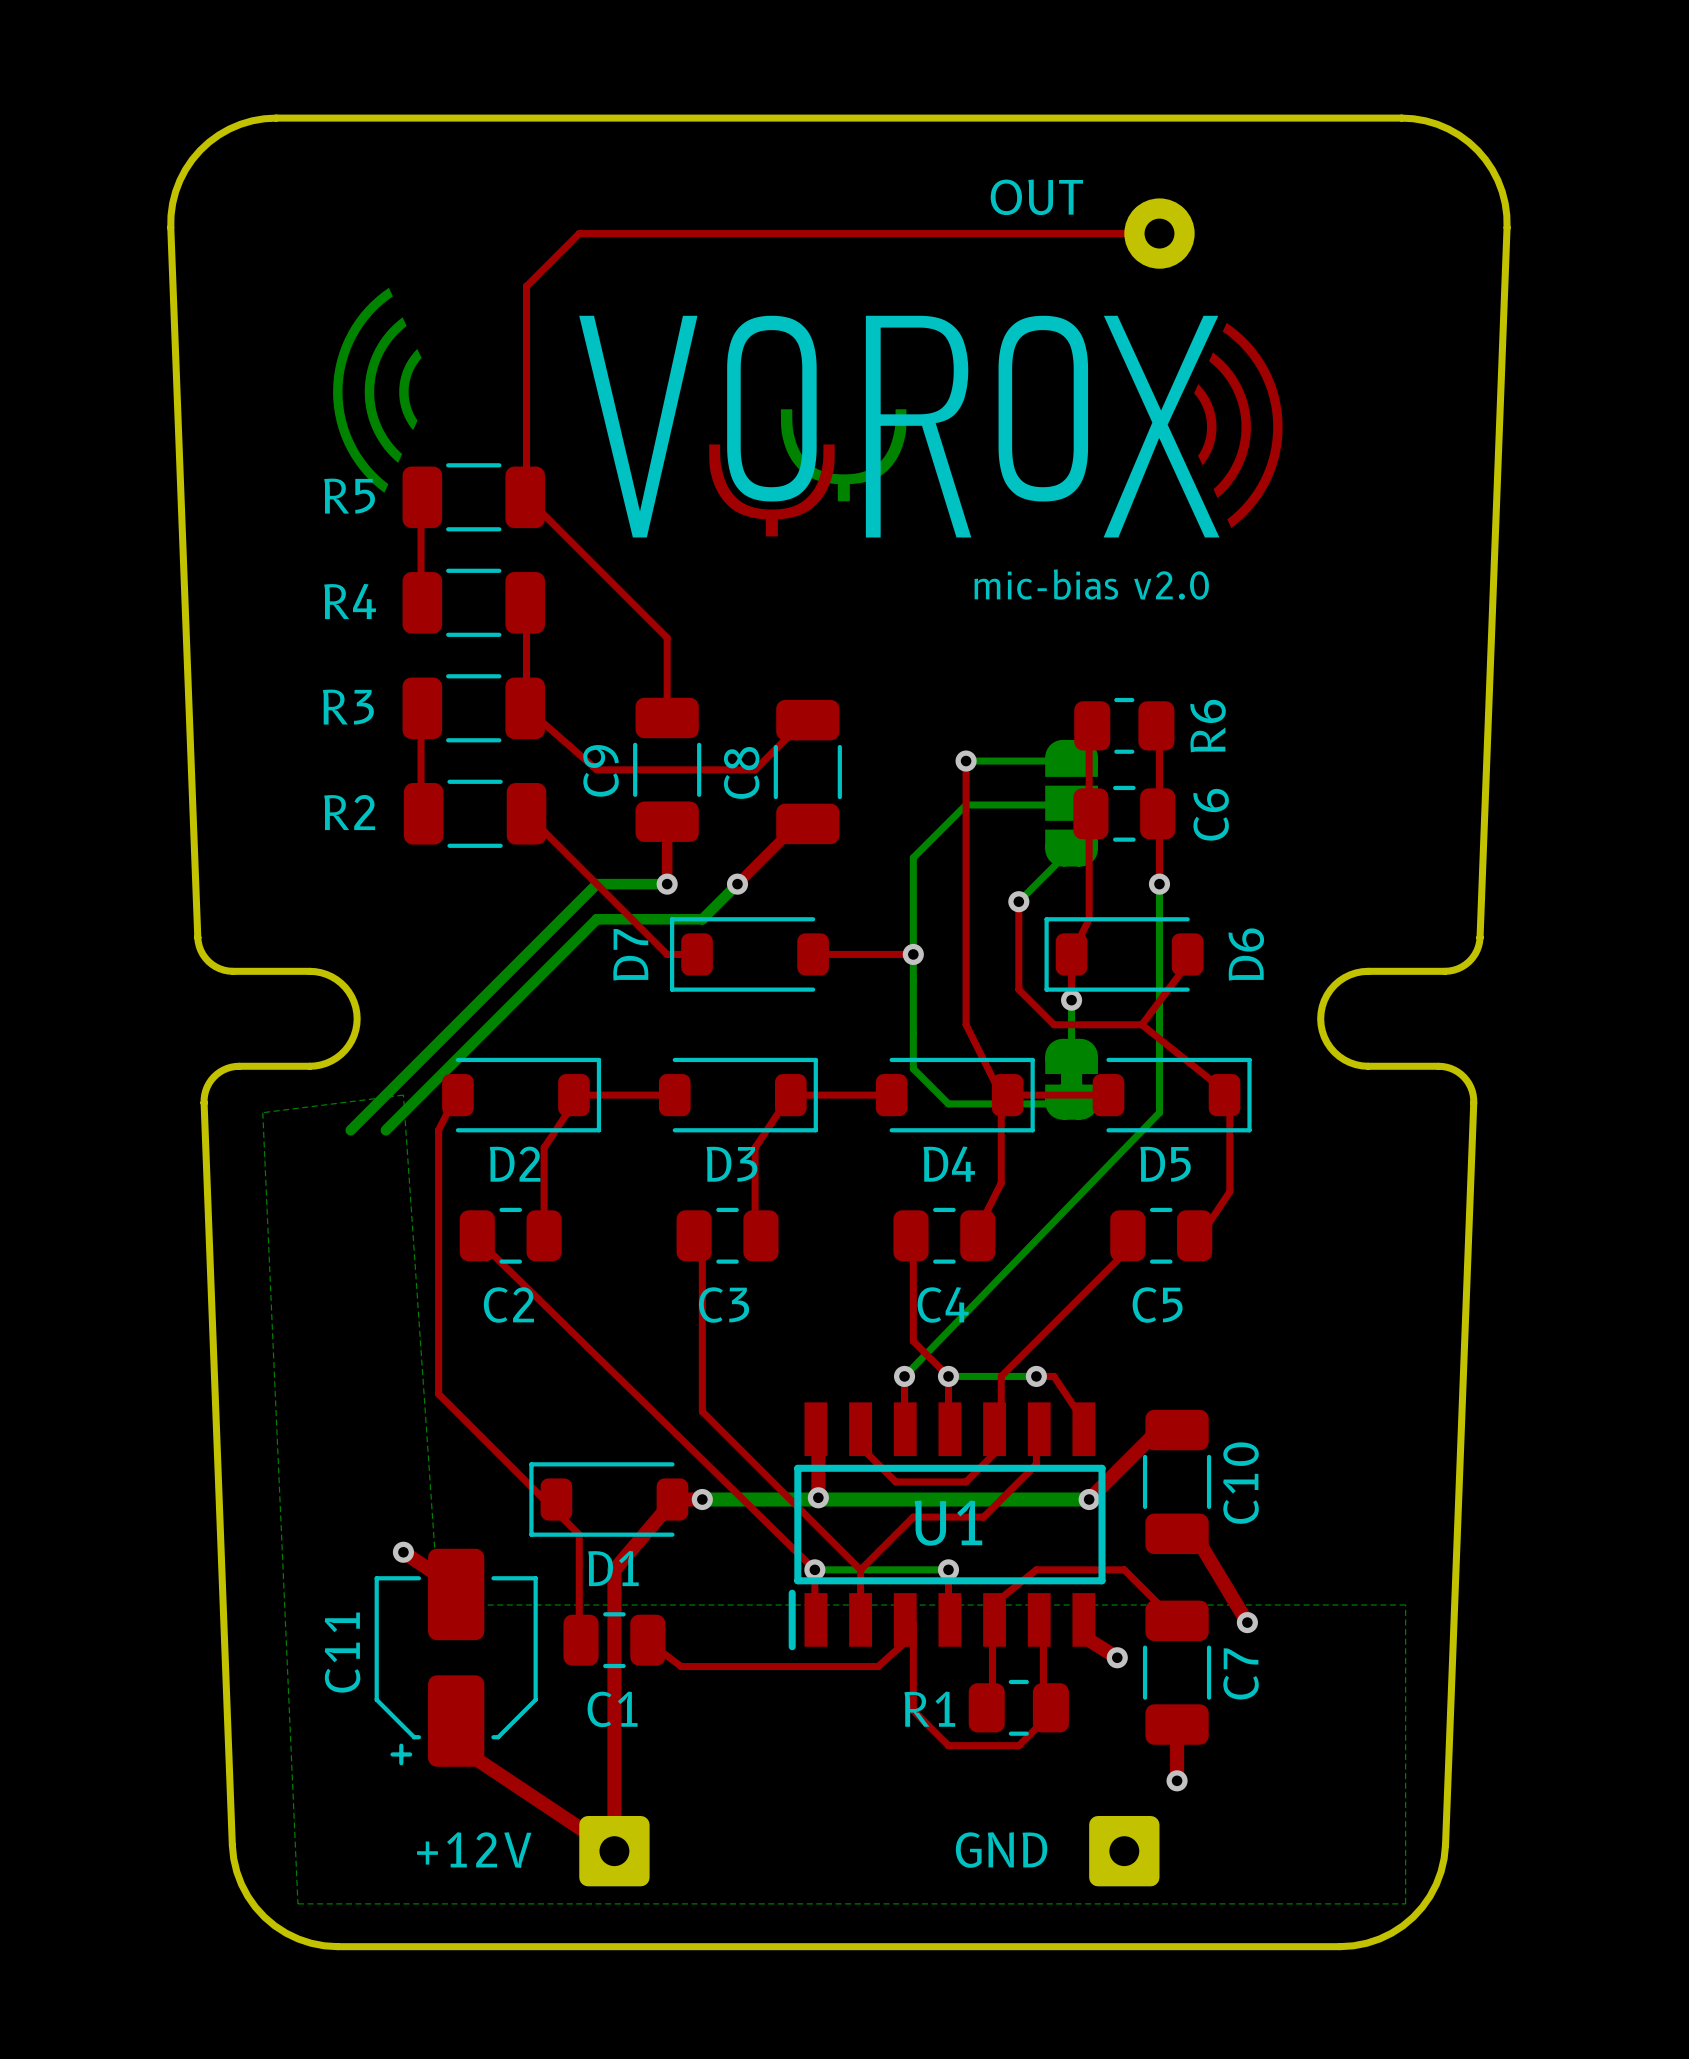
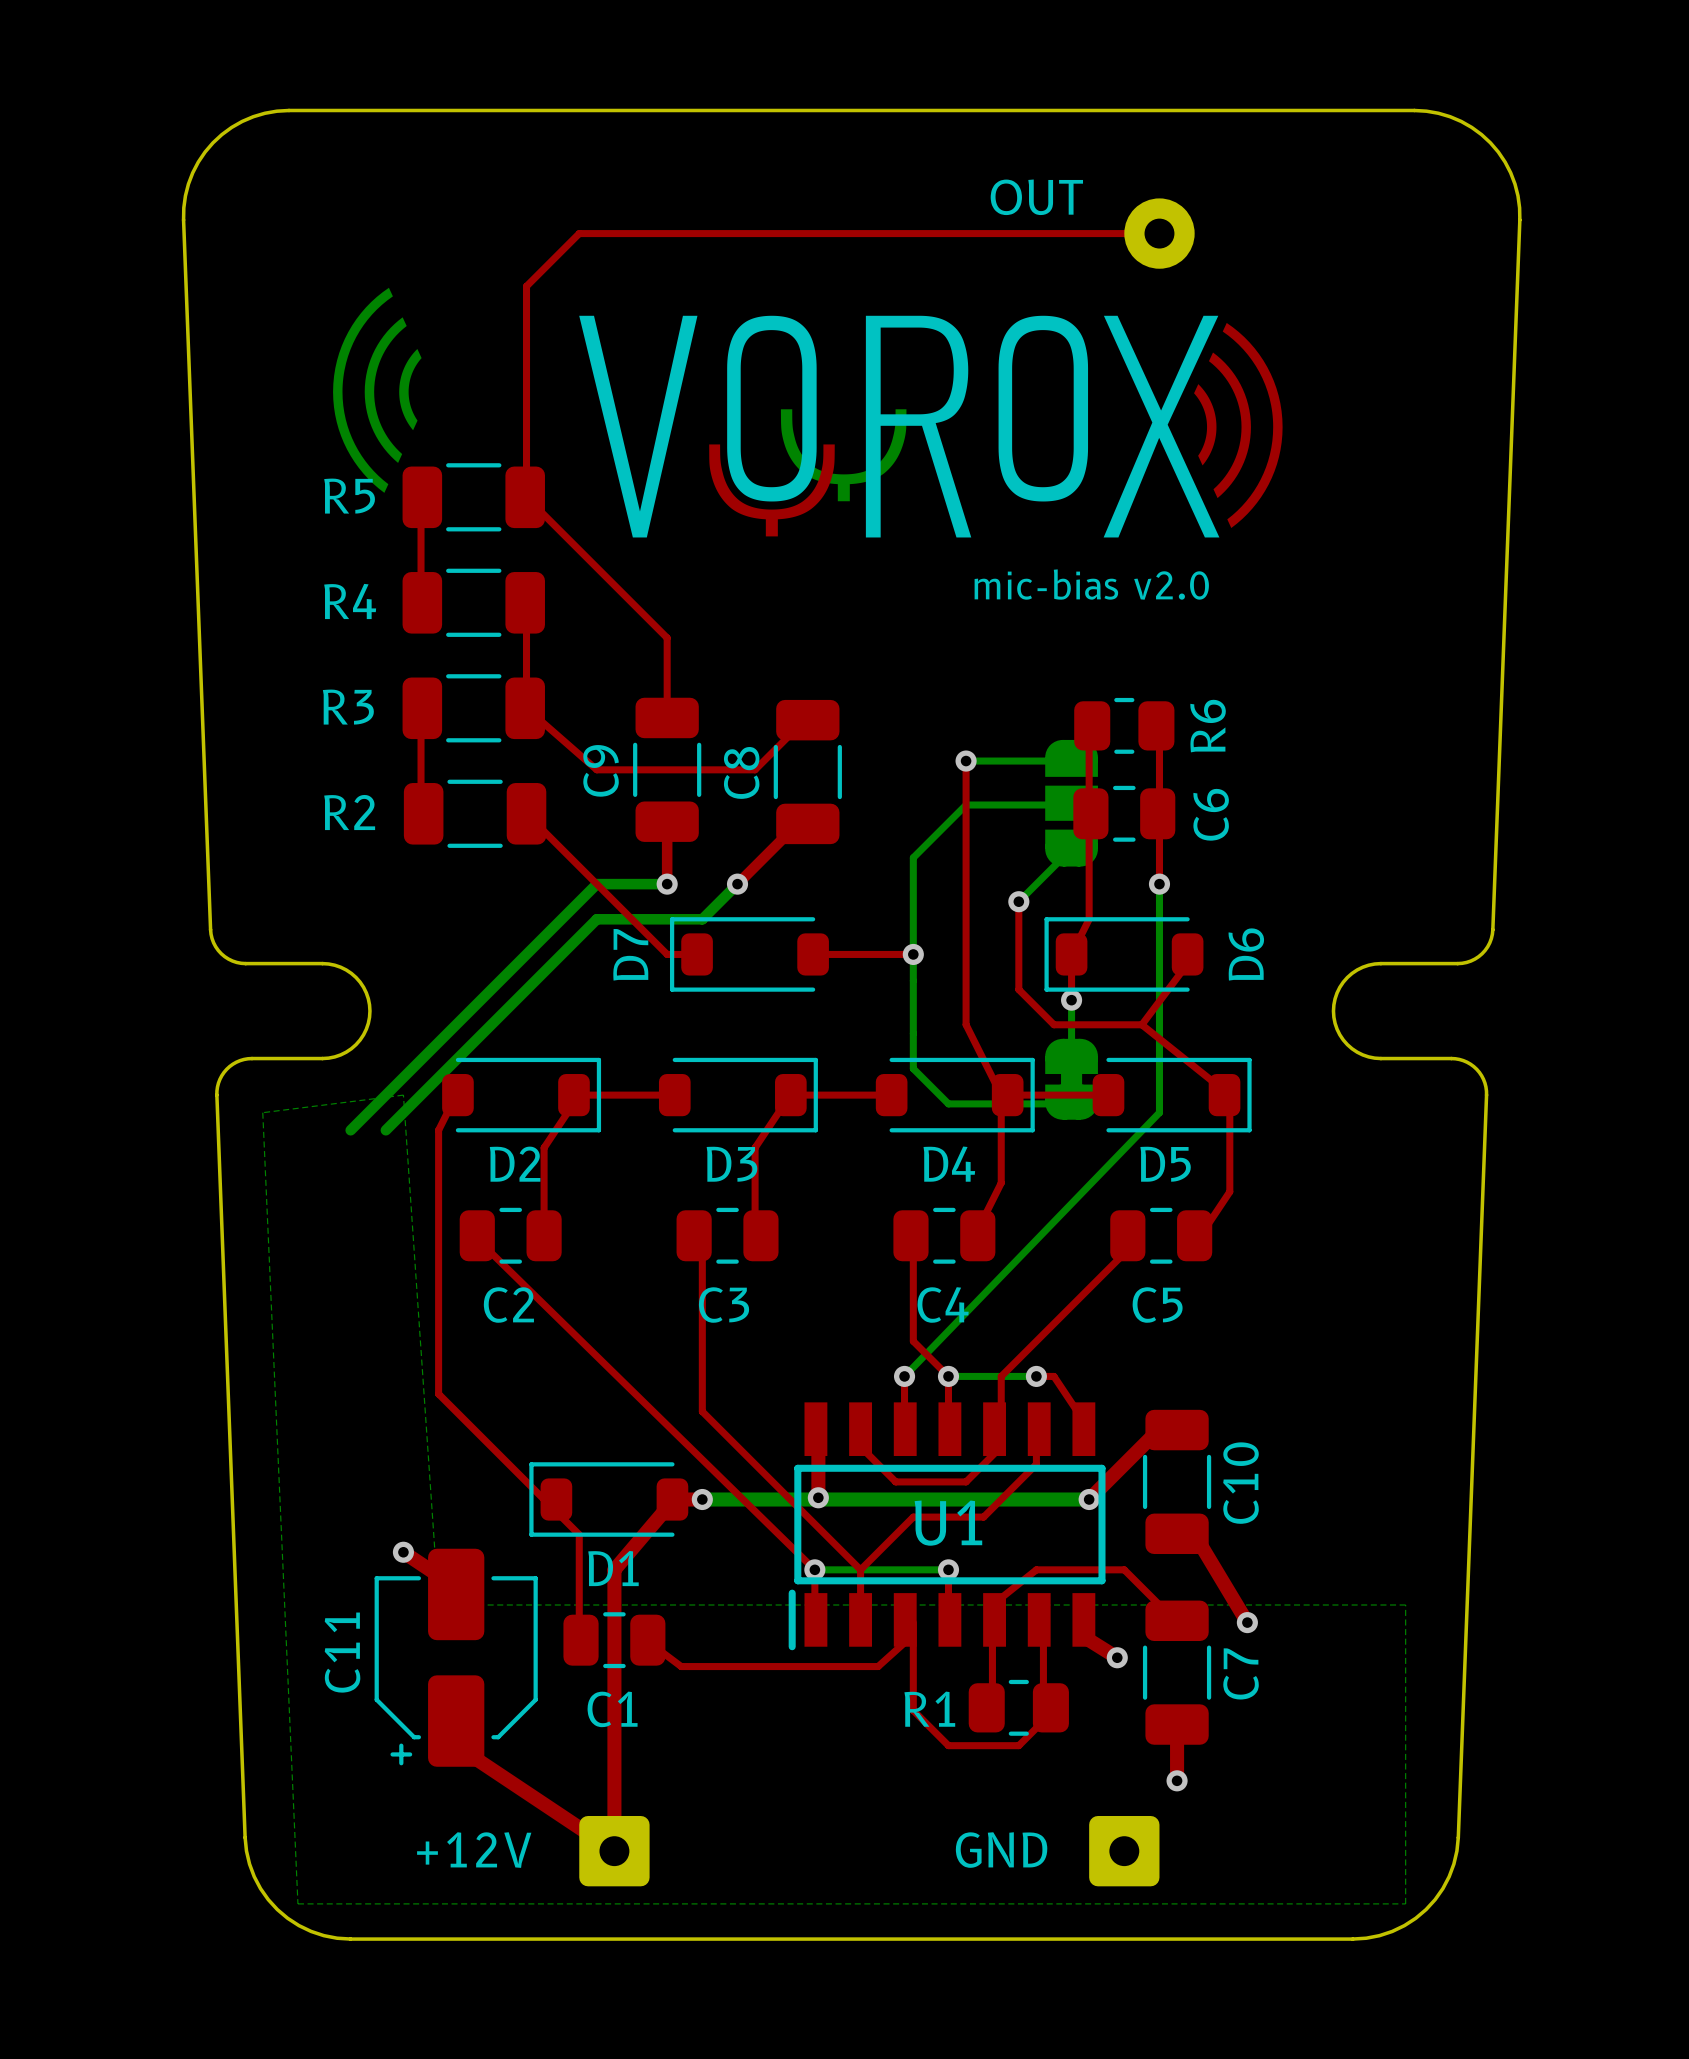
board edge: (276, 118) (1401, 118) (1425, 120) (1458, 135) (1477, 150) (1492, 169) (1505, 203) (1507, 227) (1479, 941) (1474, 954) (1469, 961) (1453, 970) (1368, 971) (1349, 974) (1339, 981) (1330, 989) (1324, 1000) (1320, 1018) (1322, 1031) (1327, 1042) (1334, 1052) (1344, 1059) (1361, 1065) (1438, 1066) (1450, 1068) (1466, 1080) (1473, 1098) (1445, 1845) (1441, 1871) (1430, 1896) (1413, 1917) (1391, 1933) (1366, 1943) (1340, 1946) (337, 1946) (311, 1943) (286, 1933) (264, 1917) (247, 1896) (236, 1871) (232, 1845) (204, 1098) (211, 1080) (227, 1068) (239, 1066) (315, 1065) (331, 1060) (345, 1050) (351, 1040) (357, 1018) (351, 996) (345, 987) (331, 976) (315, 971) (224, 970) (208, 961) (199, 946) (170, 227) (172, 203) (179, 180) (200, 150) (229, 129) (252, 120) (276, 118) -> (289, 110) (264, 113) (242, 121) (212, 142) (192, 172) (185, 195) (183, 220) (212, 938) (221, 953) (236, 962) (322, 963) (340, 967) (351, 973) (363, 987) (368, 998) (369, 1011) (368, 1023) (363, 1034) (356, 1044) (346, 1052) (328, 1058) (252, 1058) (240, 1060) (224, 1072) (216, 1091) (245, 1837) (249, 1864) (260, 1888) (277, 1909) (298, 1925) (323, 1935) (350, 1939) (1352, 1939) (1379, 1935) (1404, 1925) (1426, 1909) (1442, 1888) (1453, 1864) (1458, 1837) (1486, 1091) (1479, 1072) (1463, 1060) (1451, 1058) (1374, 1058) (1357, 1052) (1347, 1044) (1339, 1034) (1335, 1023) (1333, 1011) (1335, 998) (1339, 987) (1352, 973) (1362, 967) (1380, 963) (1466, 962) (1474, 959) (1485, 950) (1492, 934) (1519, 220) (1515, 184) (1505, 162) (1490, 142) (1471, 127) (1450, 116) (1414, 110) (289, 110)

